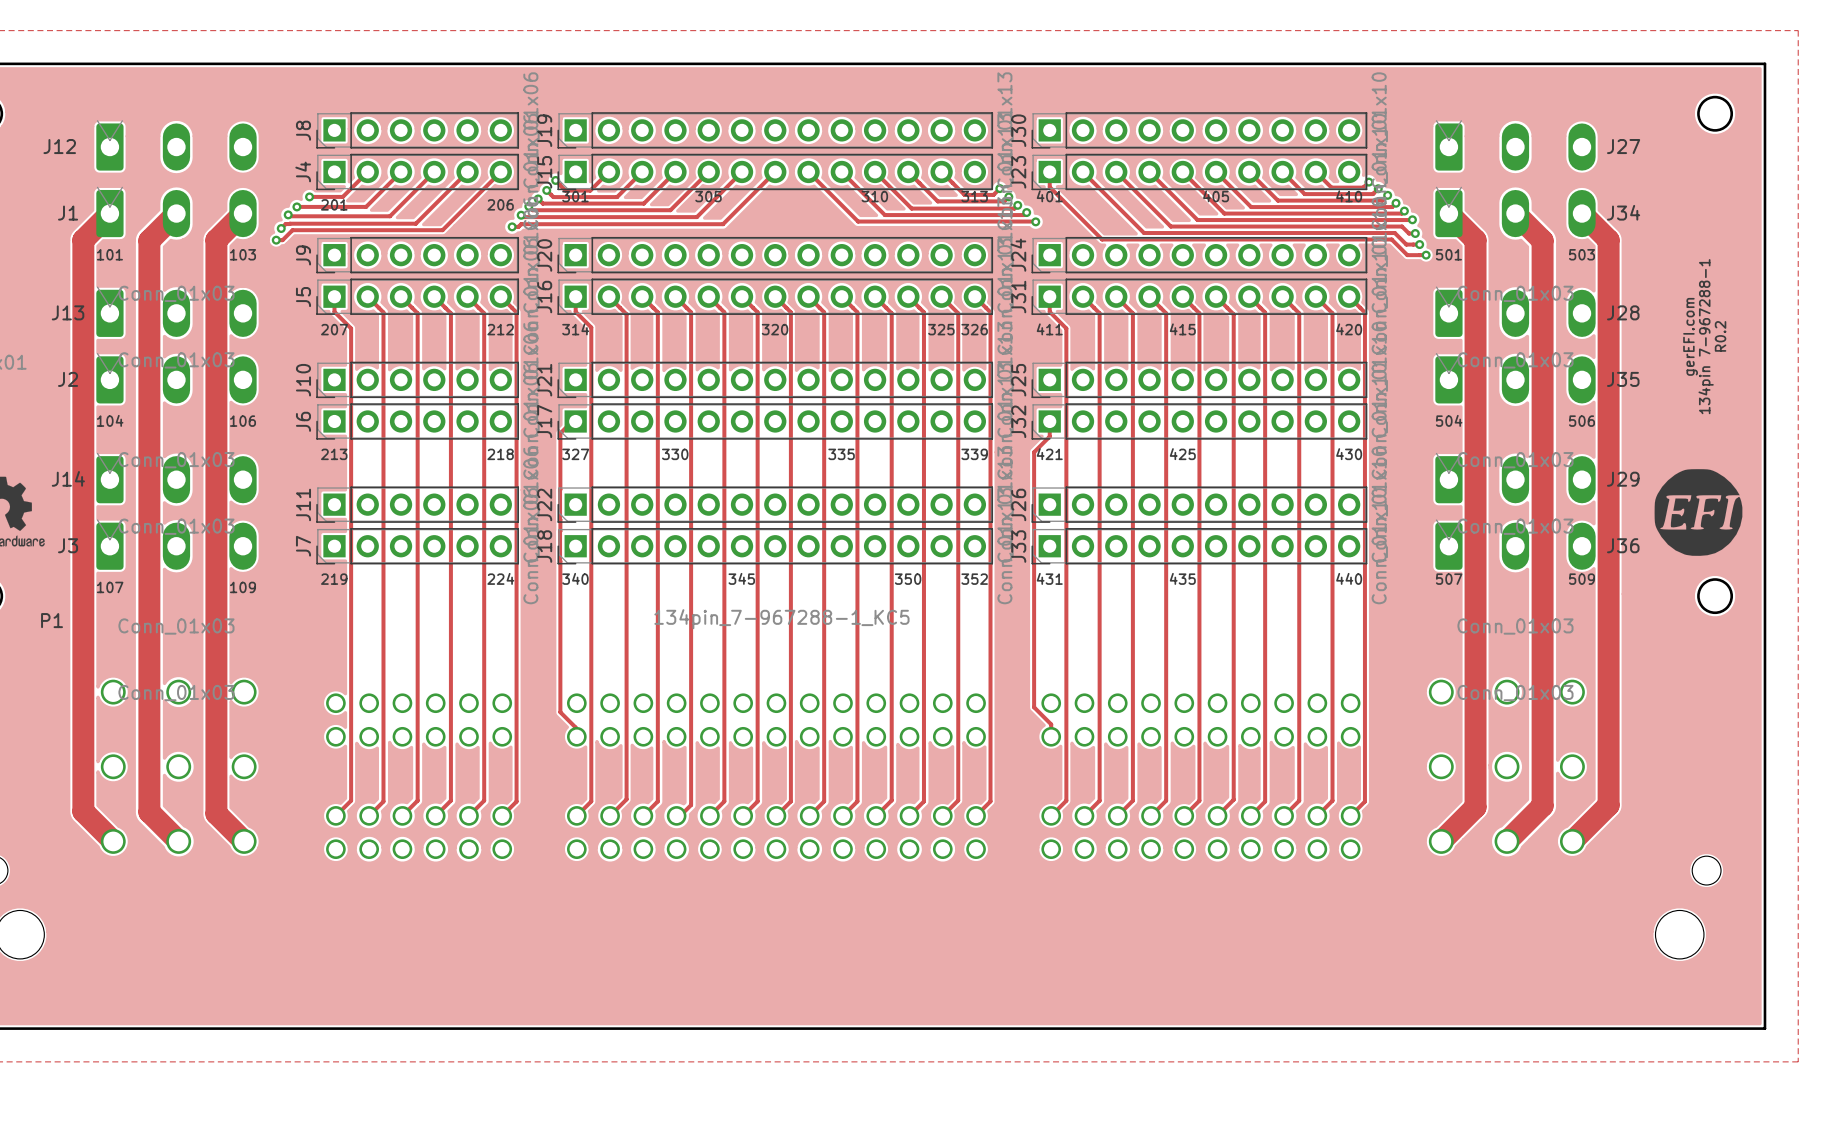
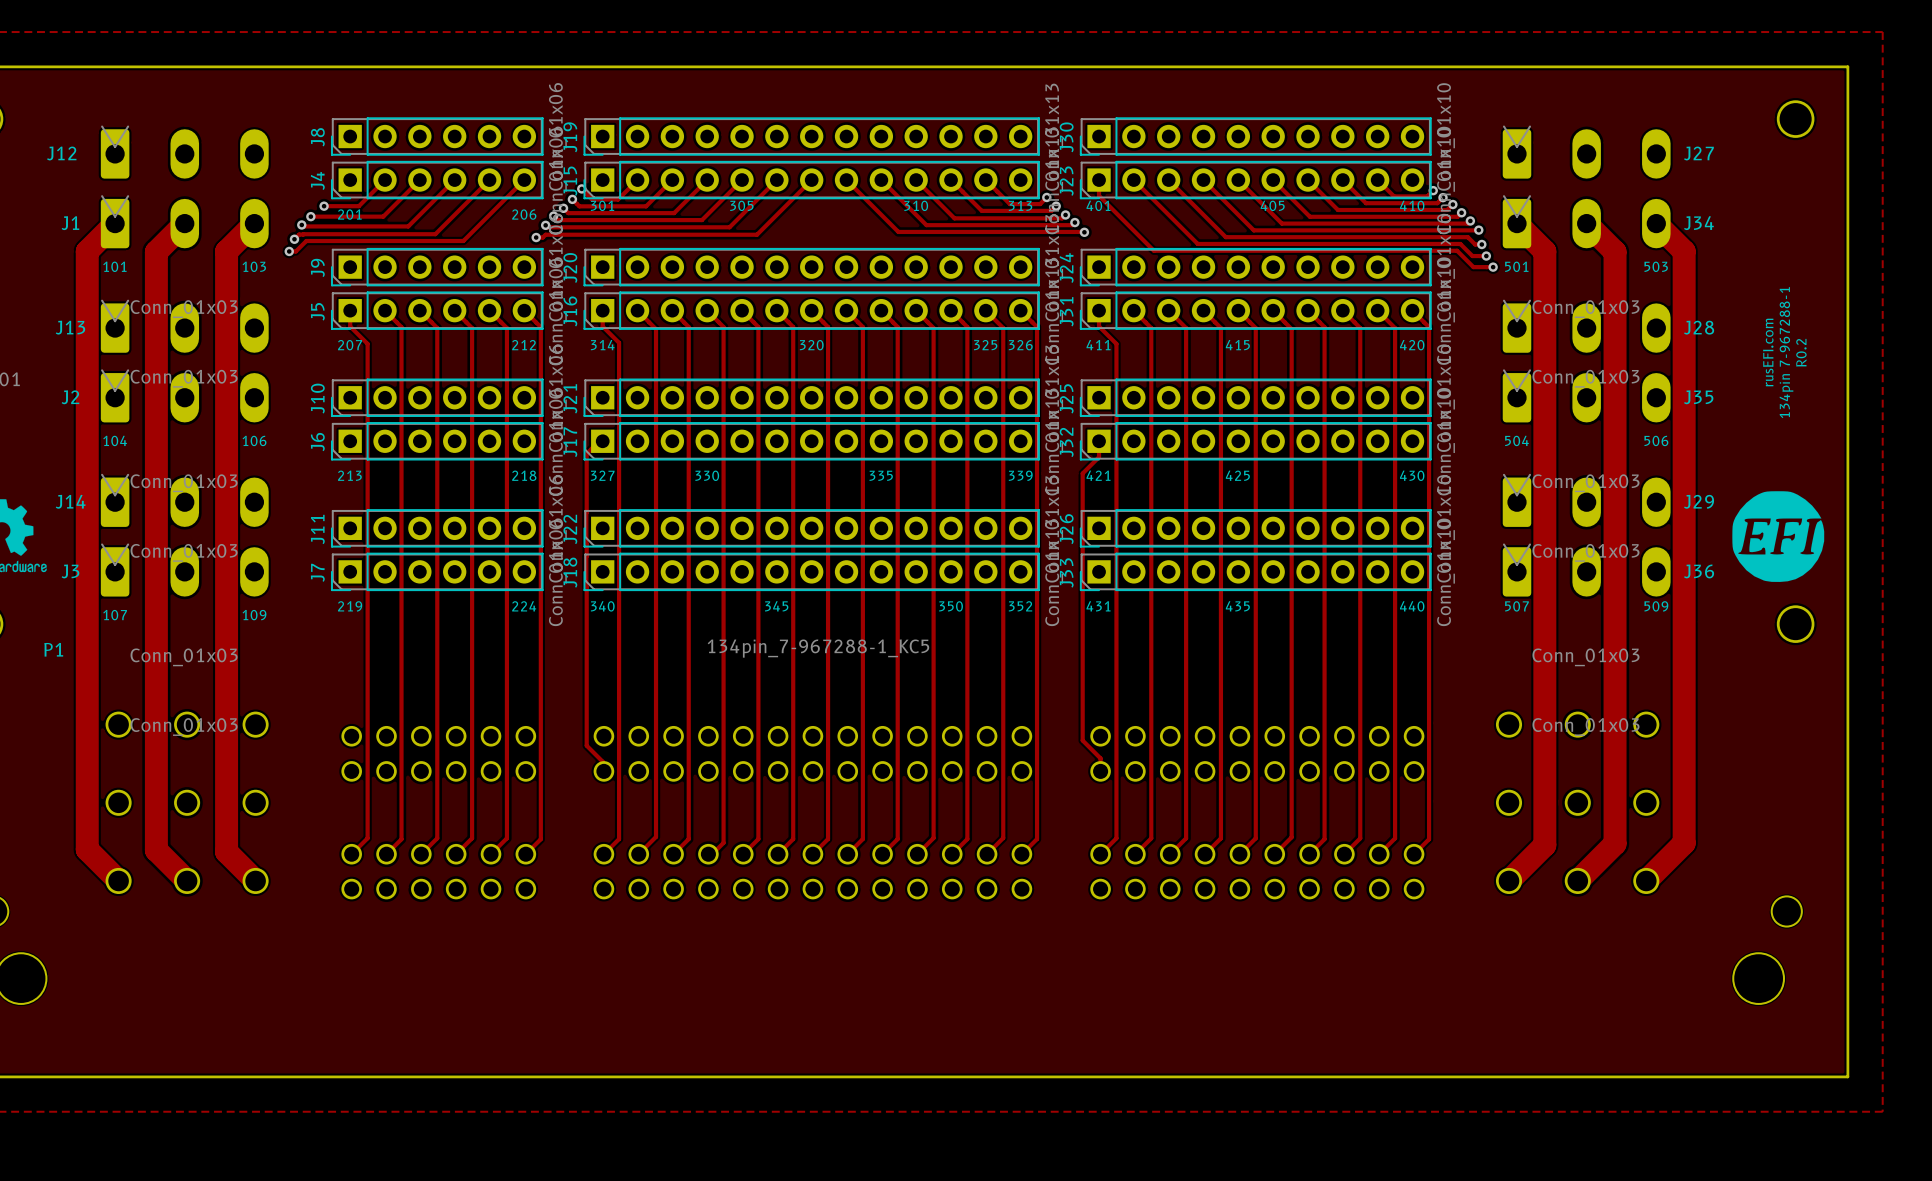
text: gerEFI.com (1690, 336) -> rusEFI.com (1768, 352)

